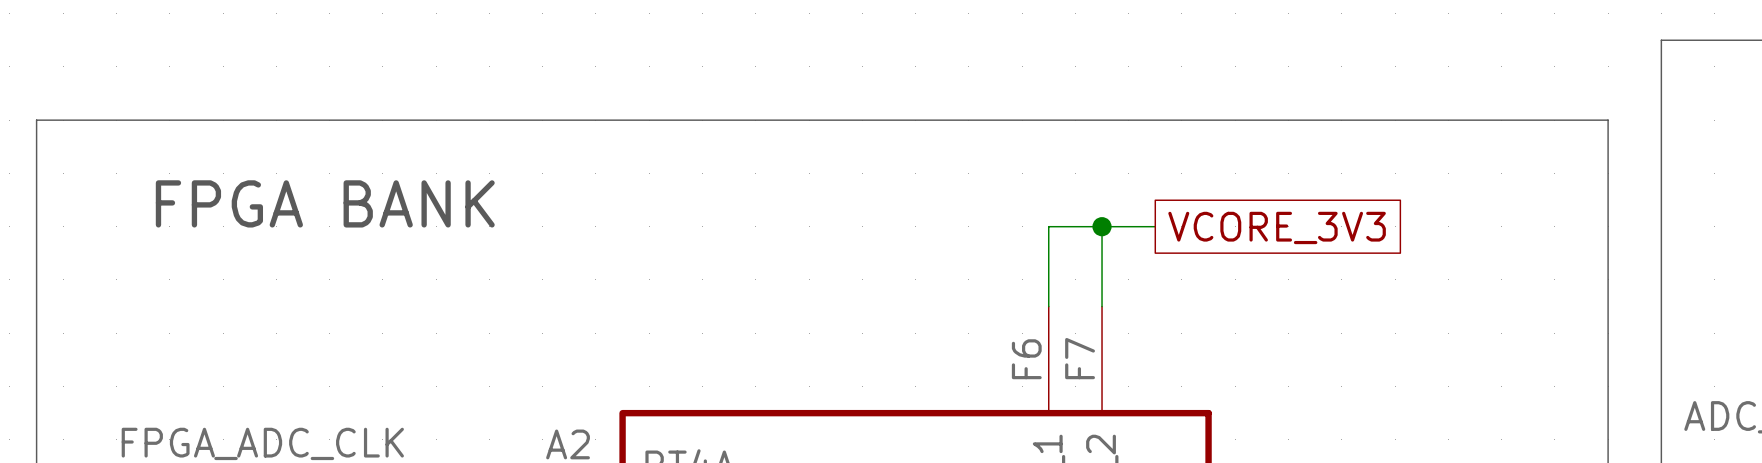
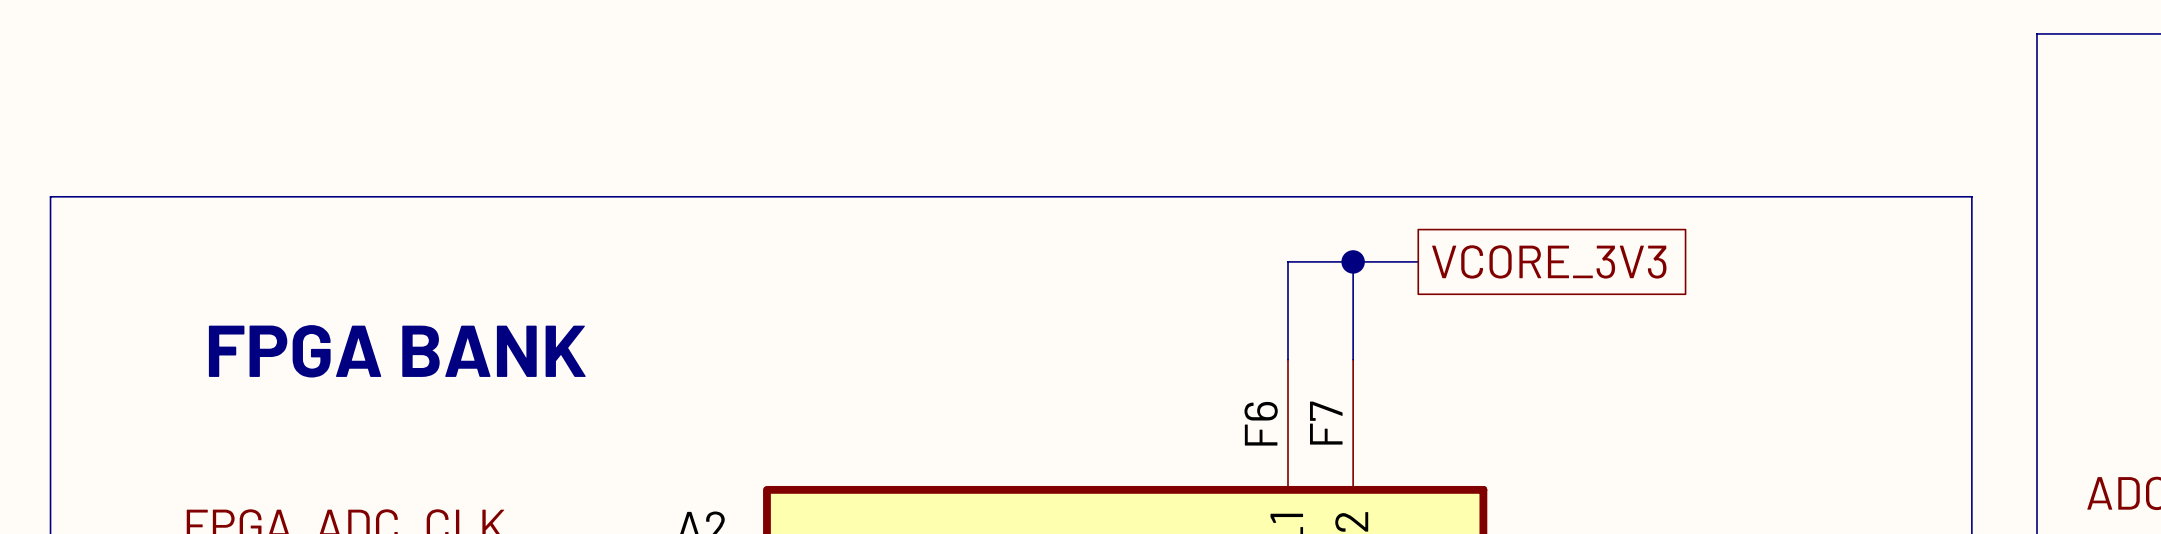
line: (36, 173) (36, 120) (1608, 120) (1608, 173) -> (50, 196) (1971, 196)
text position: FPGA BANK (325, 203) -> FPGA BANK (397, 351)

